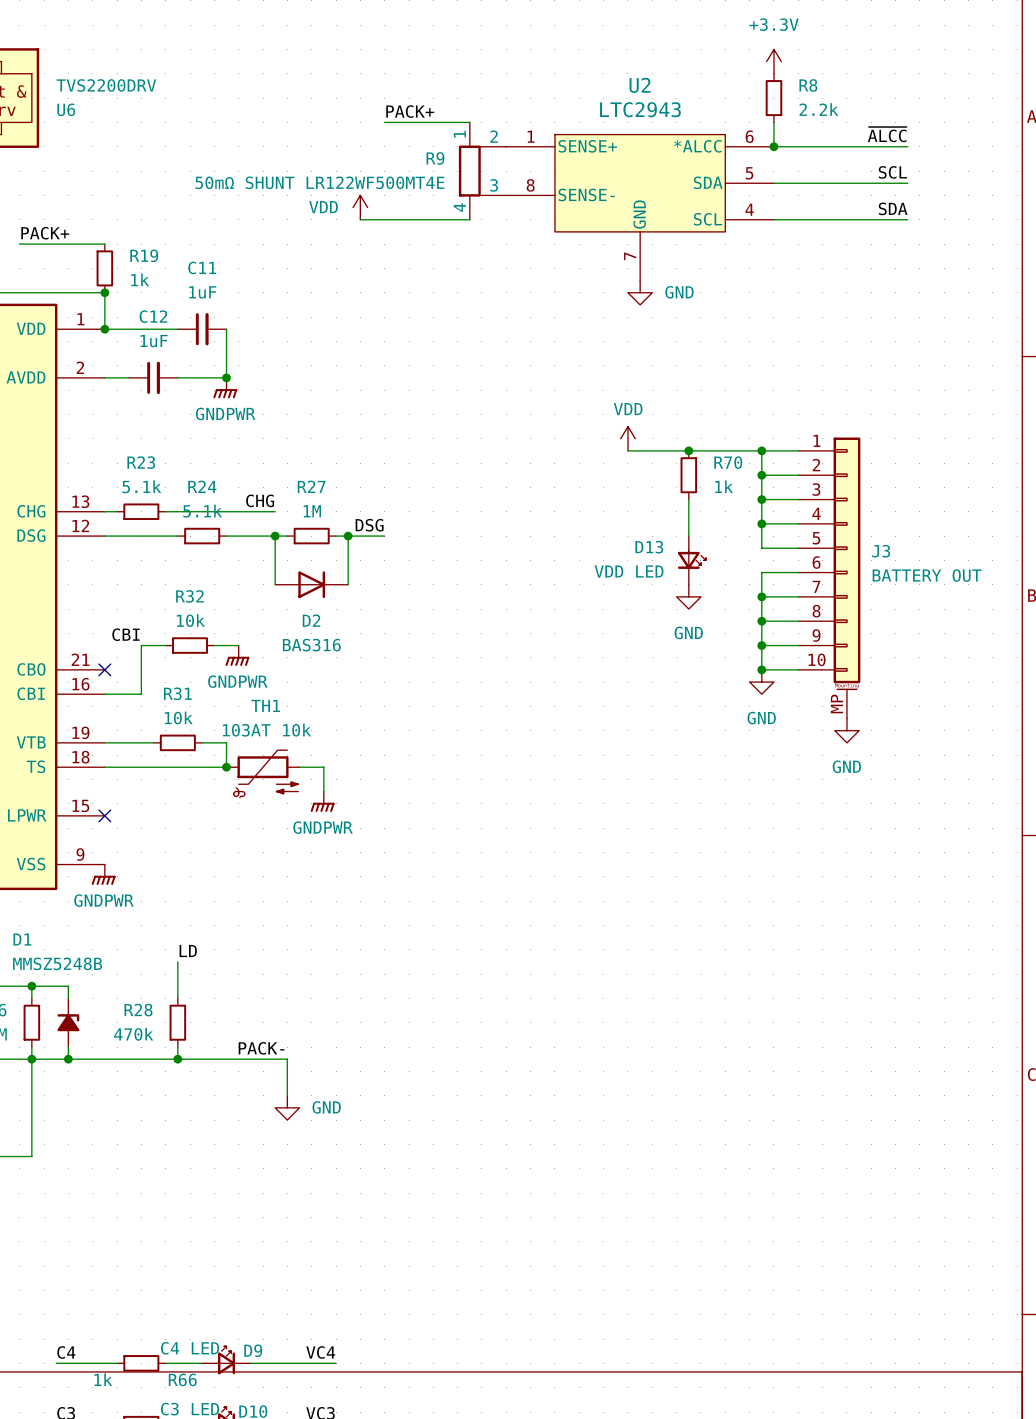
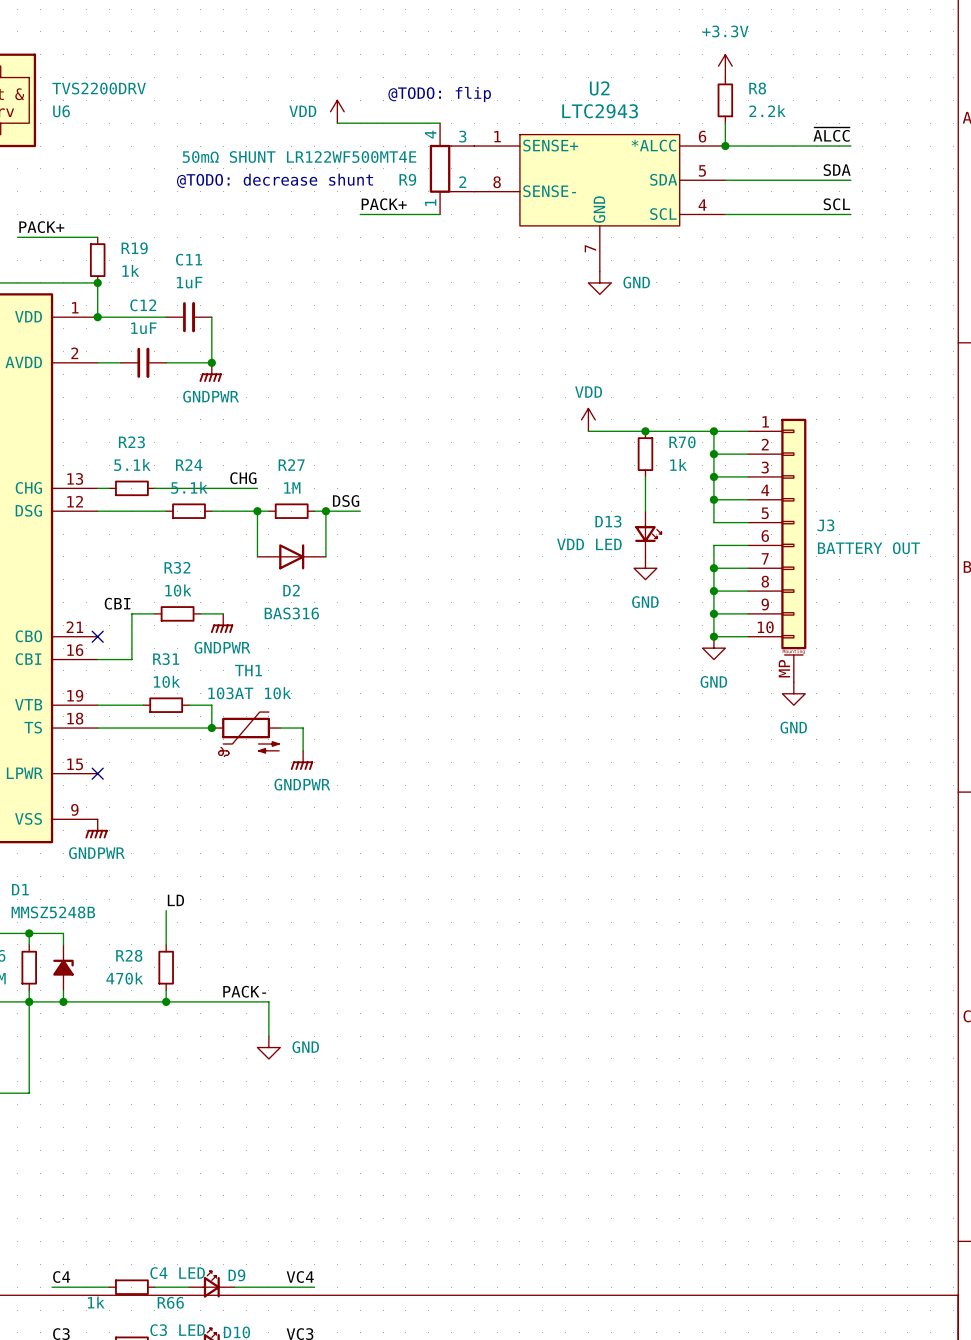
text: none -> @TODO: flip (439, 94)
label position: PACK+ (410, 111) -> PACK+ (384, 204)
R9 flip: as is (470, 171) -> up-down (440, 168)
label: SCL (892, 172) -> SDA (837, 170)
text: none -> @TODO: decrease shunt (275, 180)
power symbol position: VDD (360, 207) -> VDD (337, 111)
label: SDA (893, 208) -> SCL (836, 204)
wire: (360, 219) (384, 219) -> (337, 123) (360, 123)

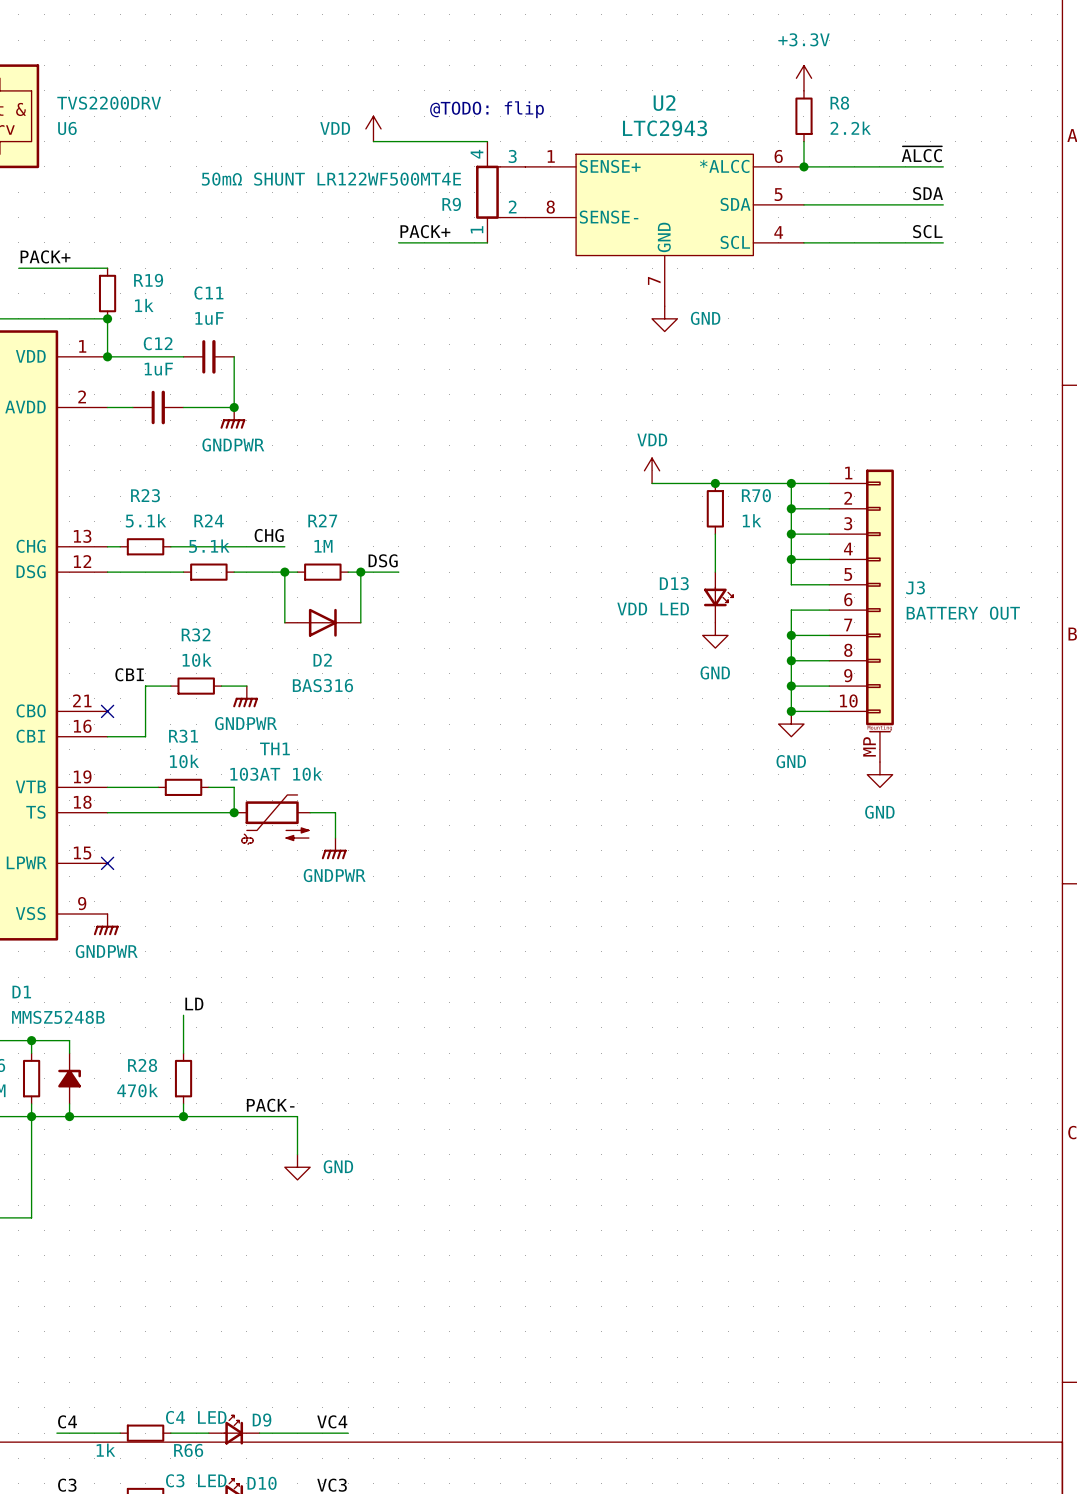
text: @TODO: decrease shunt (275, 180) -> none

